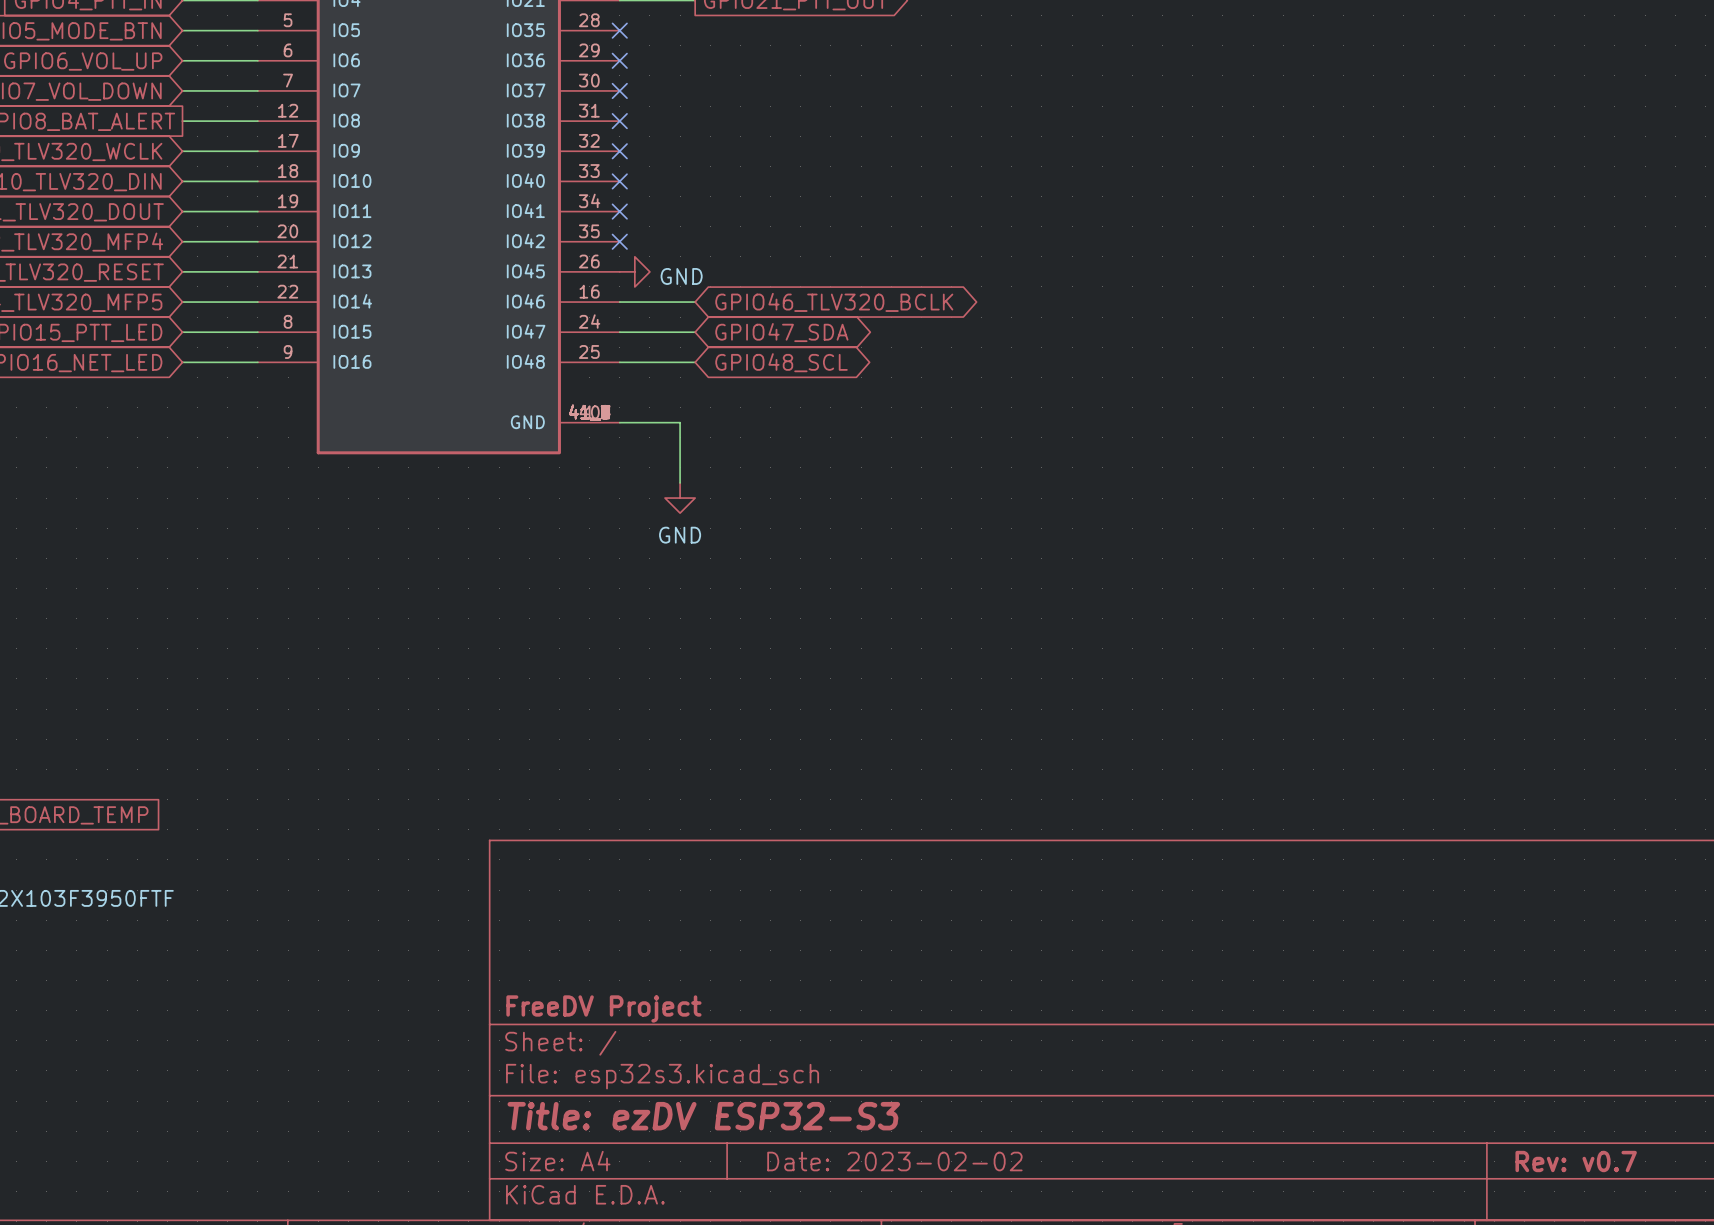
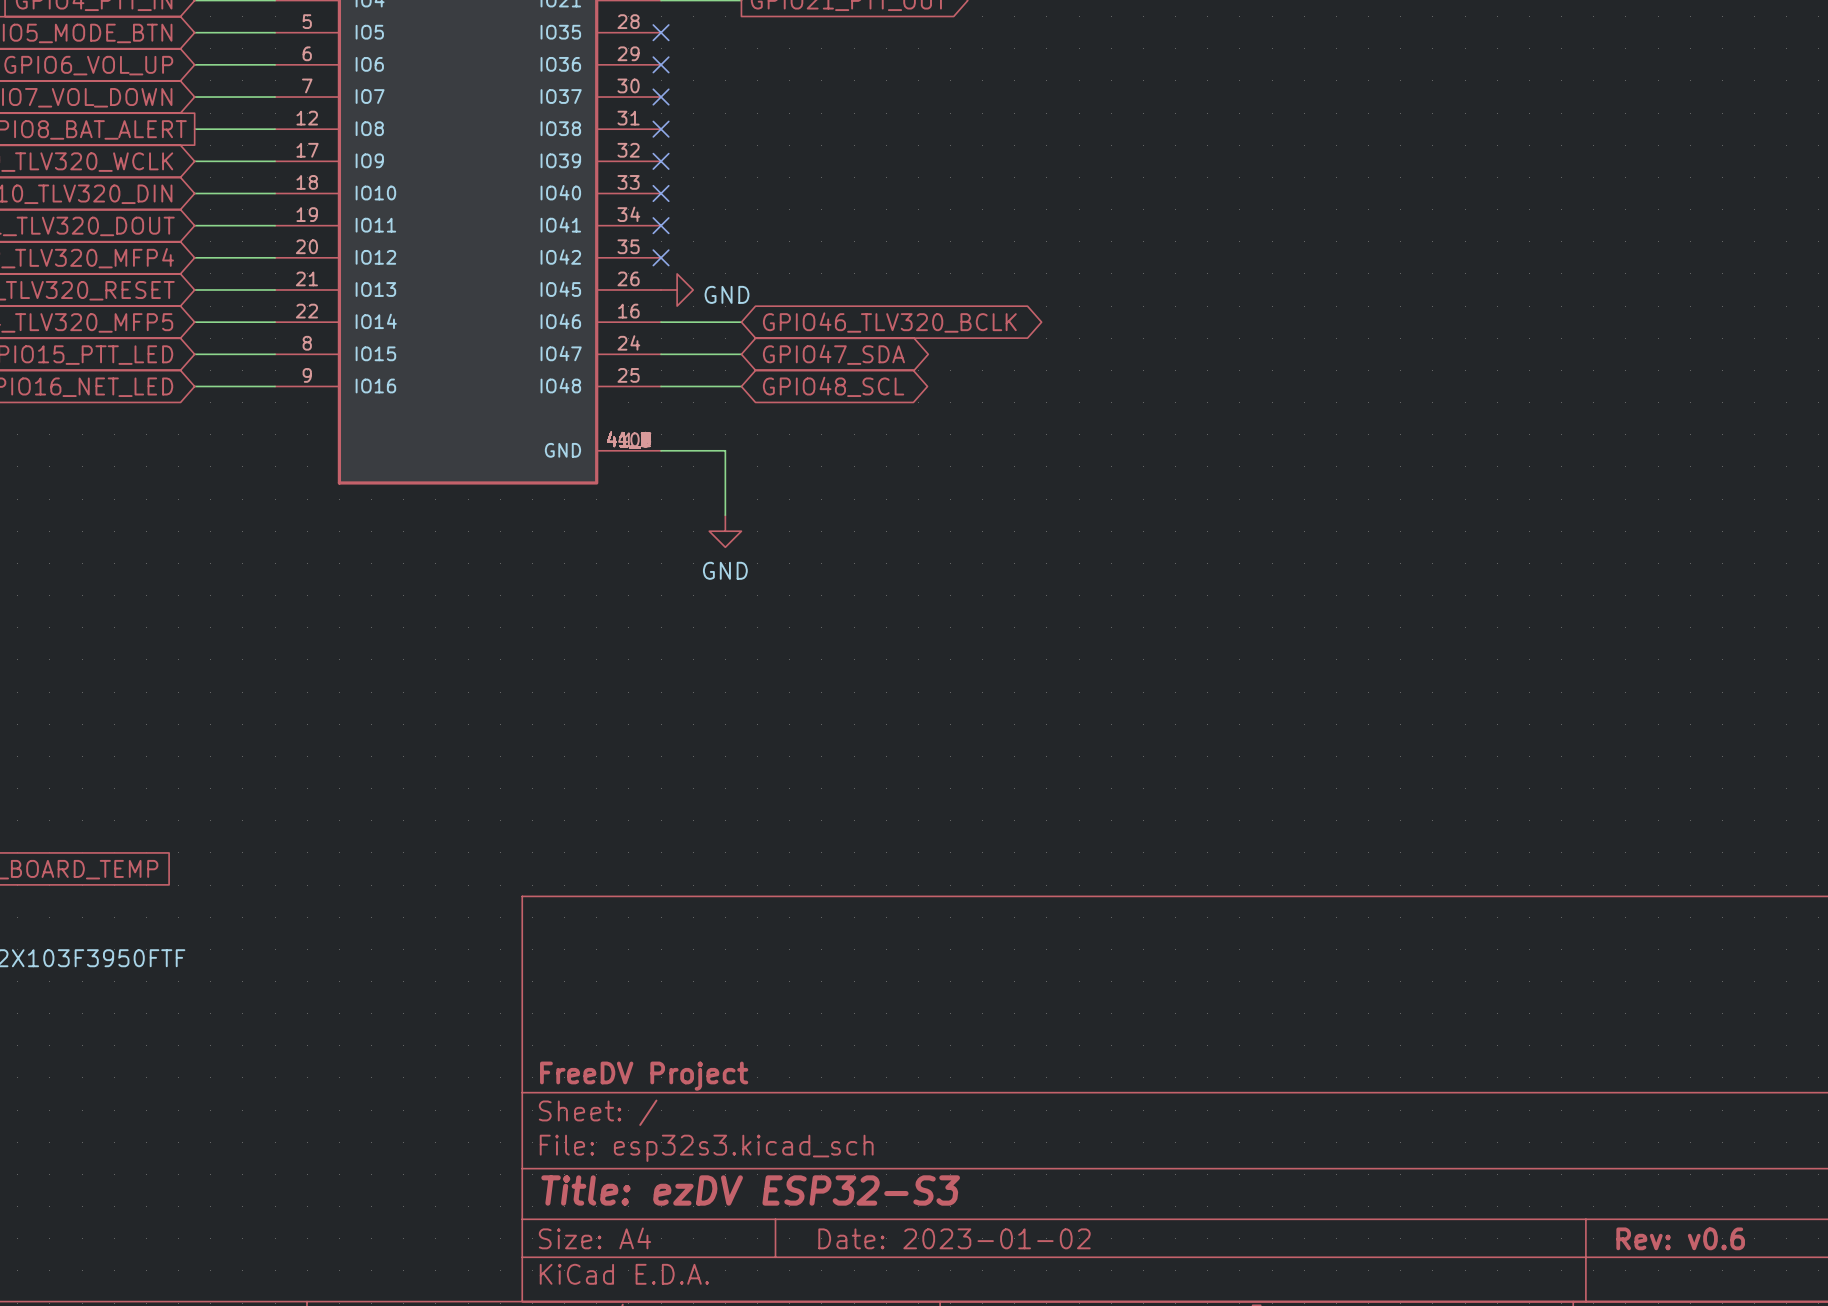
title block: Date: 2023-02-02 (894, 1161) -> Date: 2023-01-02 (954, 1238)
title block: Rev: v0.7 (1576, 1161) -> Rev: v0.6 (1680, 1238)

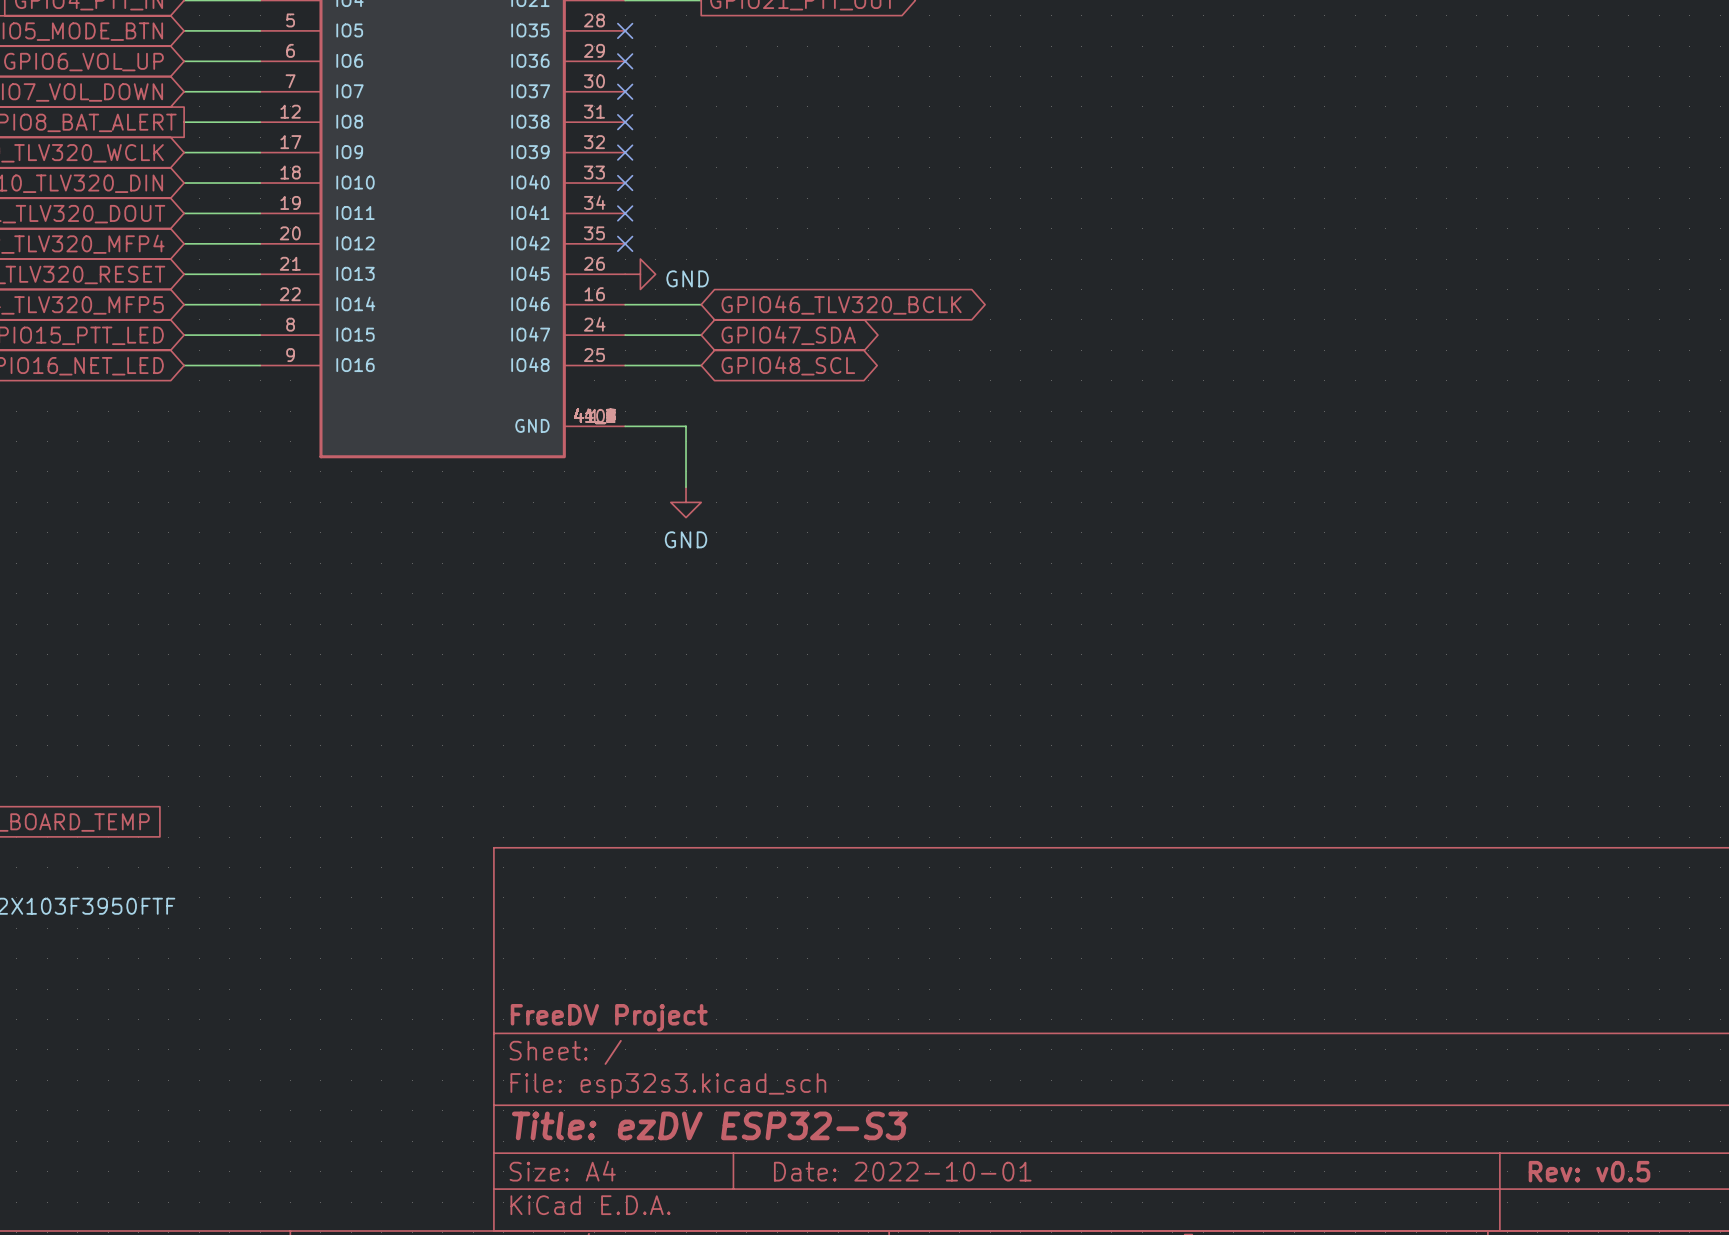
title block: Date: 2023-01-02 (954, 1238) -> Date: 2022-10-01 (902, 1171)
title block: Rev: v0.6 (1680, 1238) -> Rev: v0.5 (1589, 1171)

